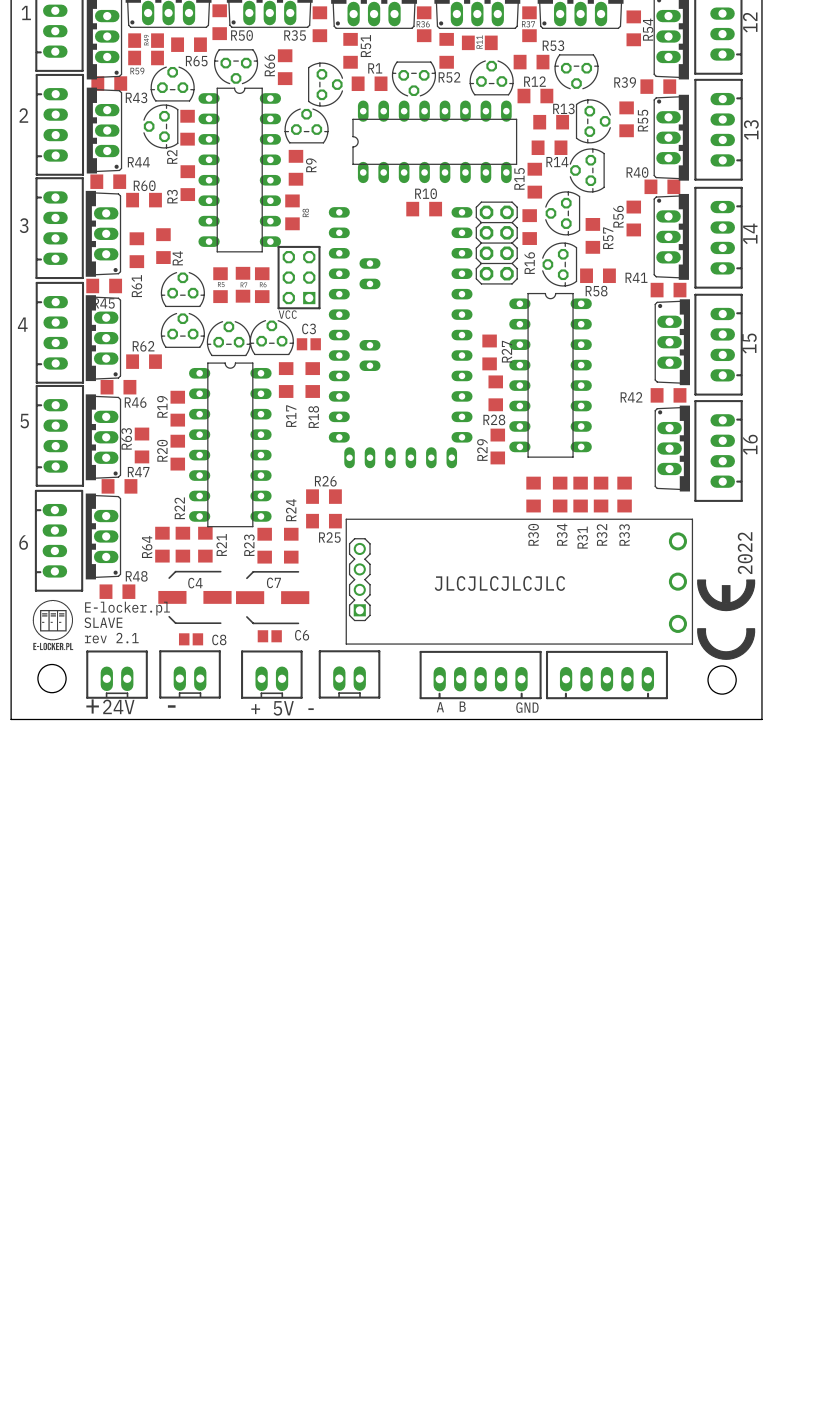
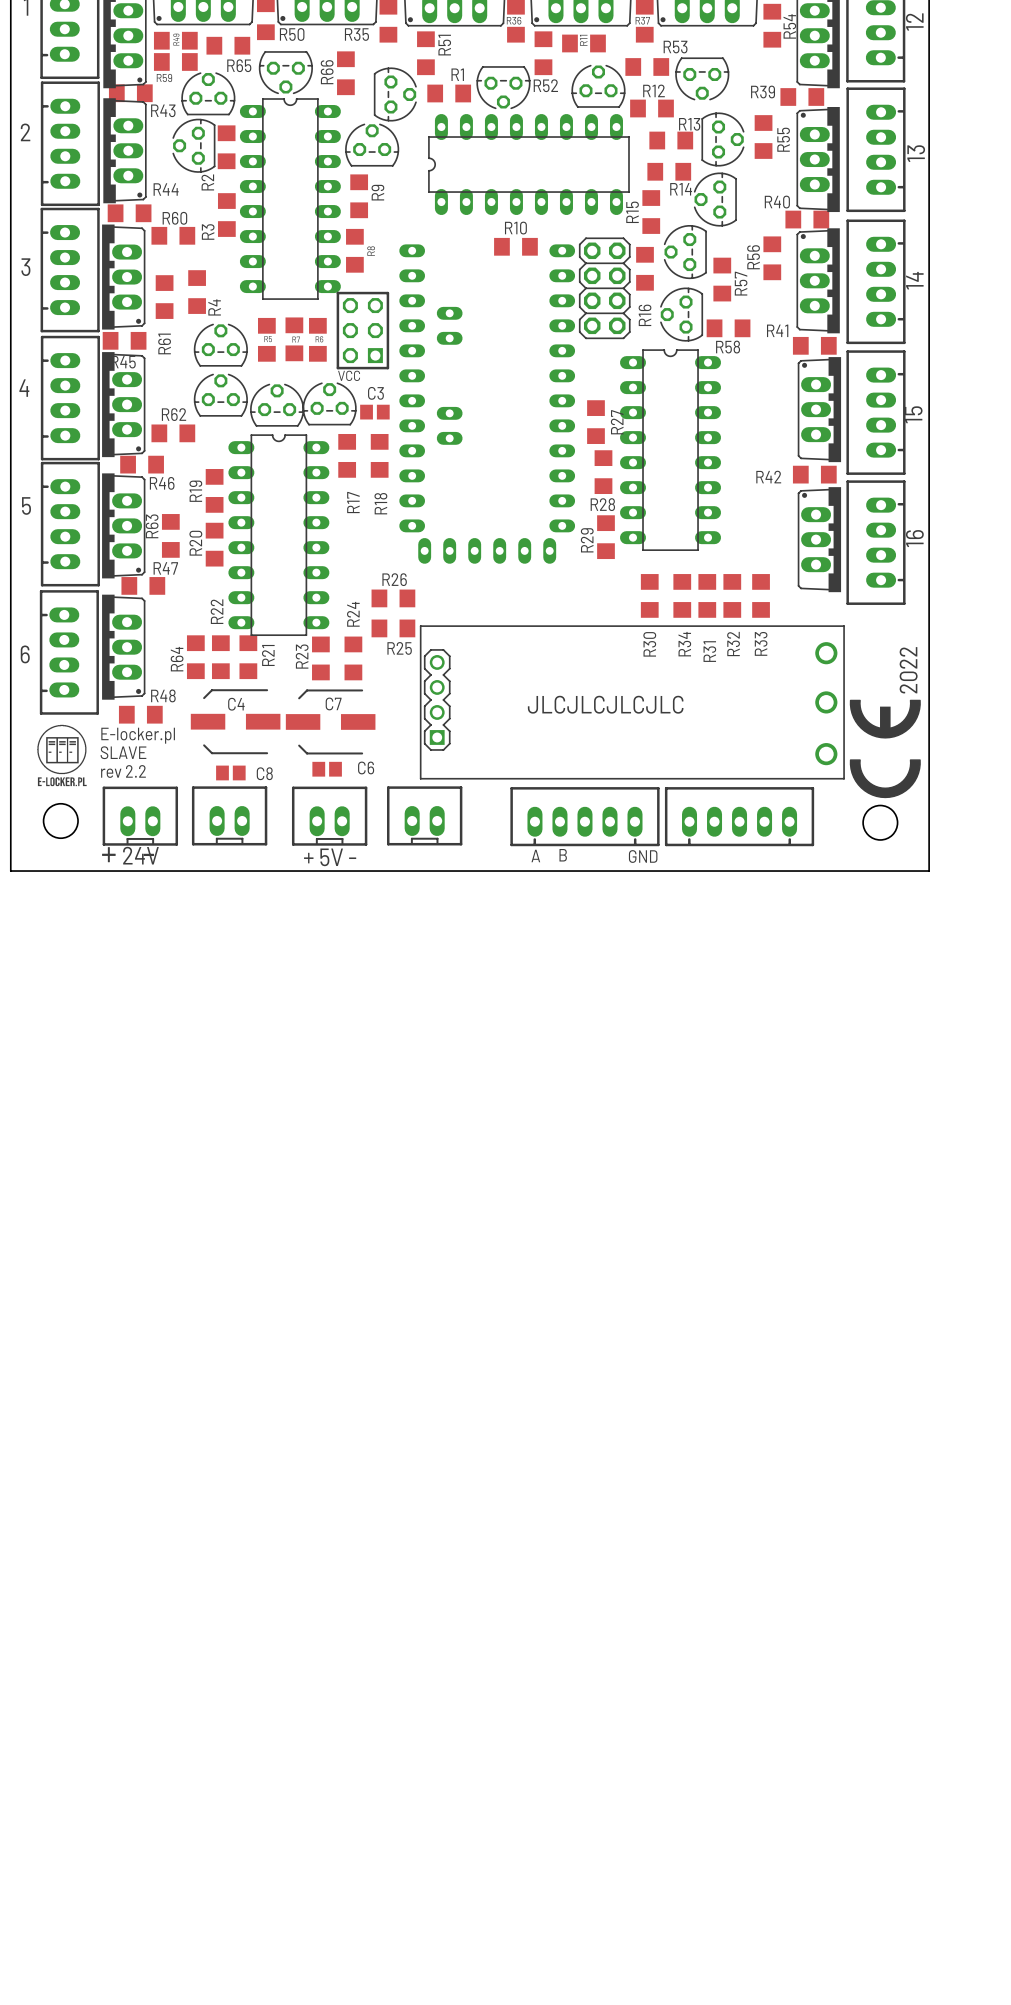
text: rev 2.1 (111, 638) -> rev 2.2 (123, 771)

